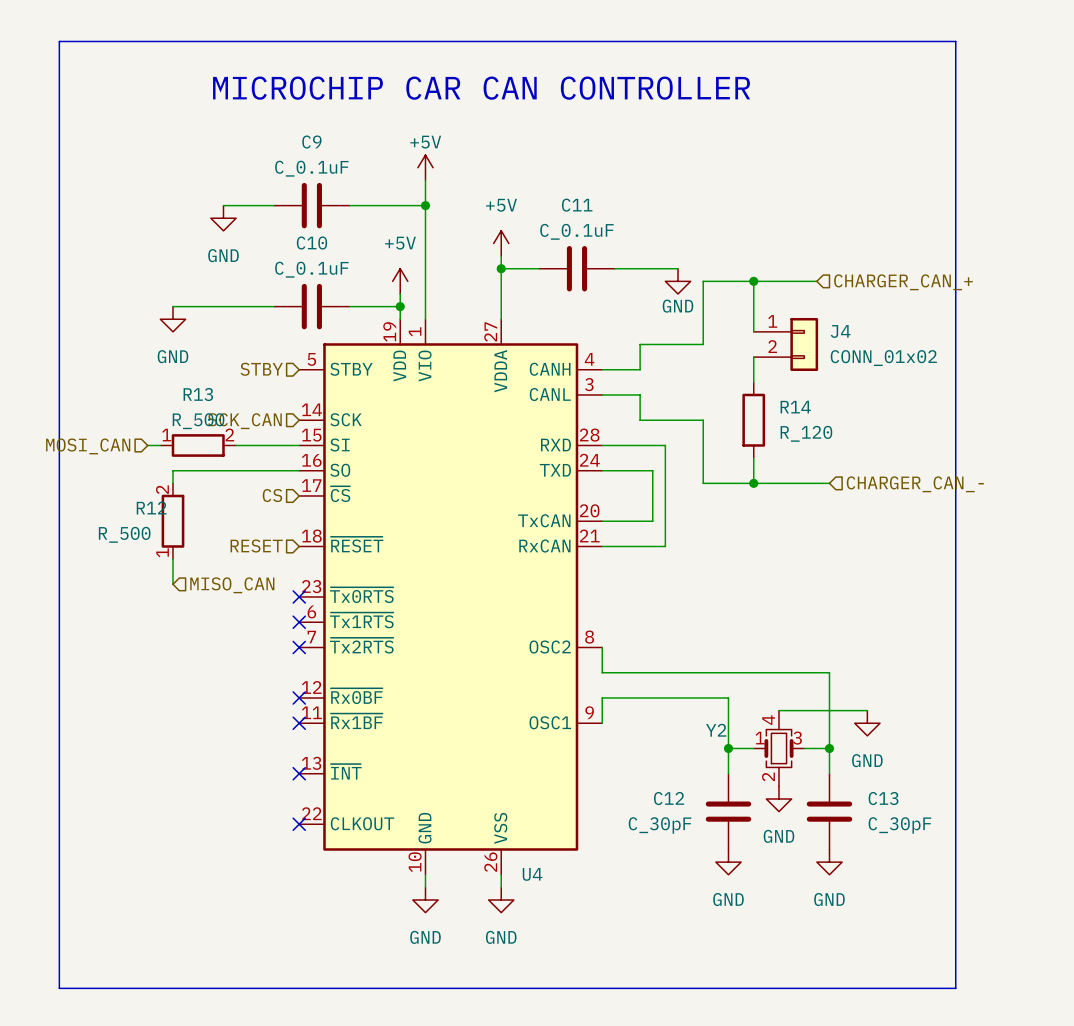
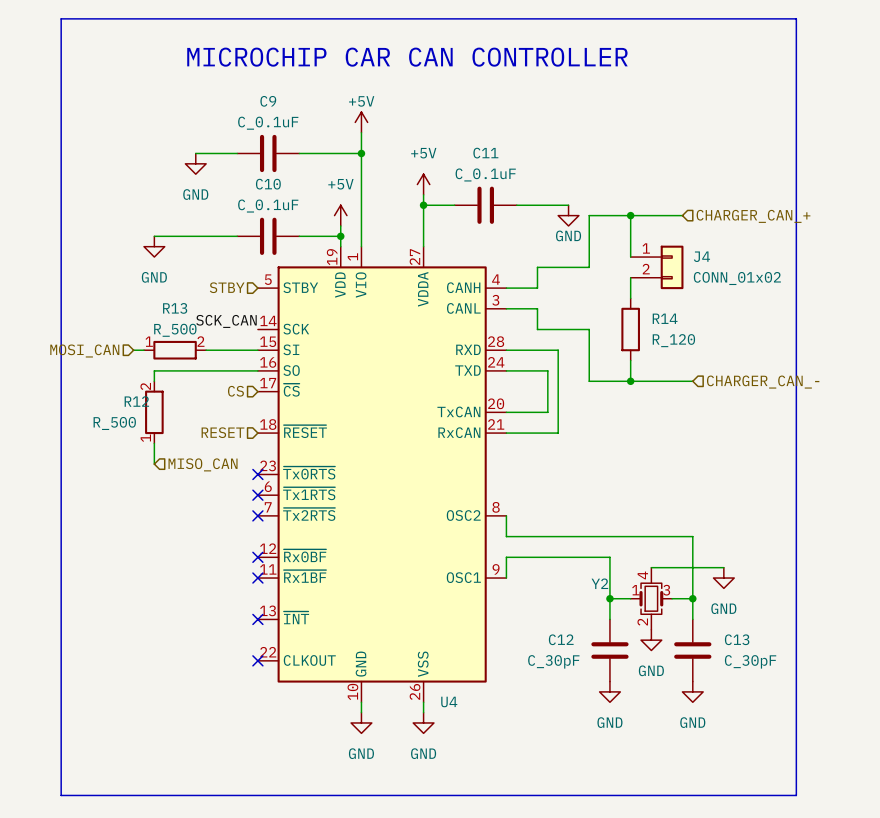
label: none -> SCK_CAN (226, 321)
hierarchical label: SCK_CAN (244, 421) -> none

